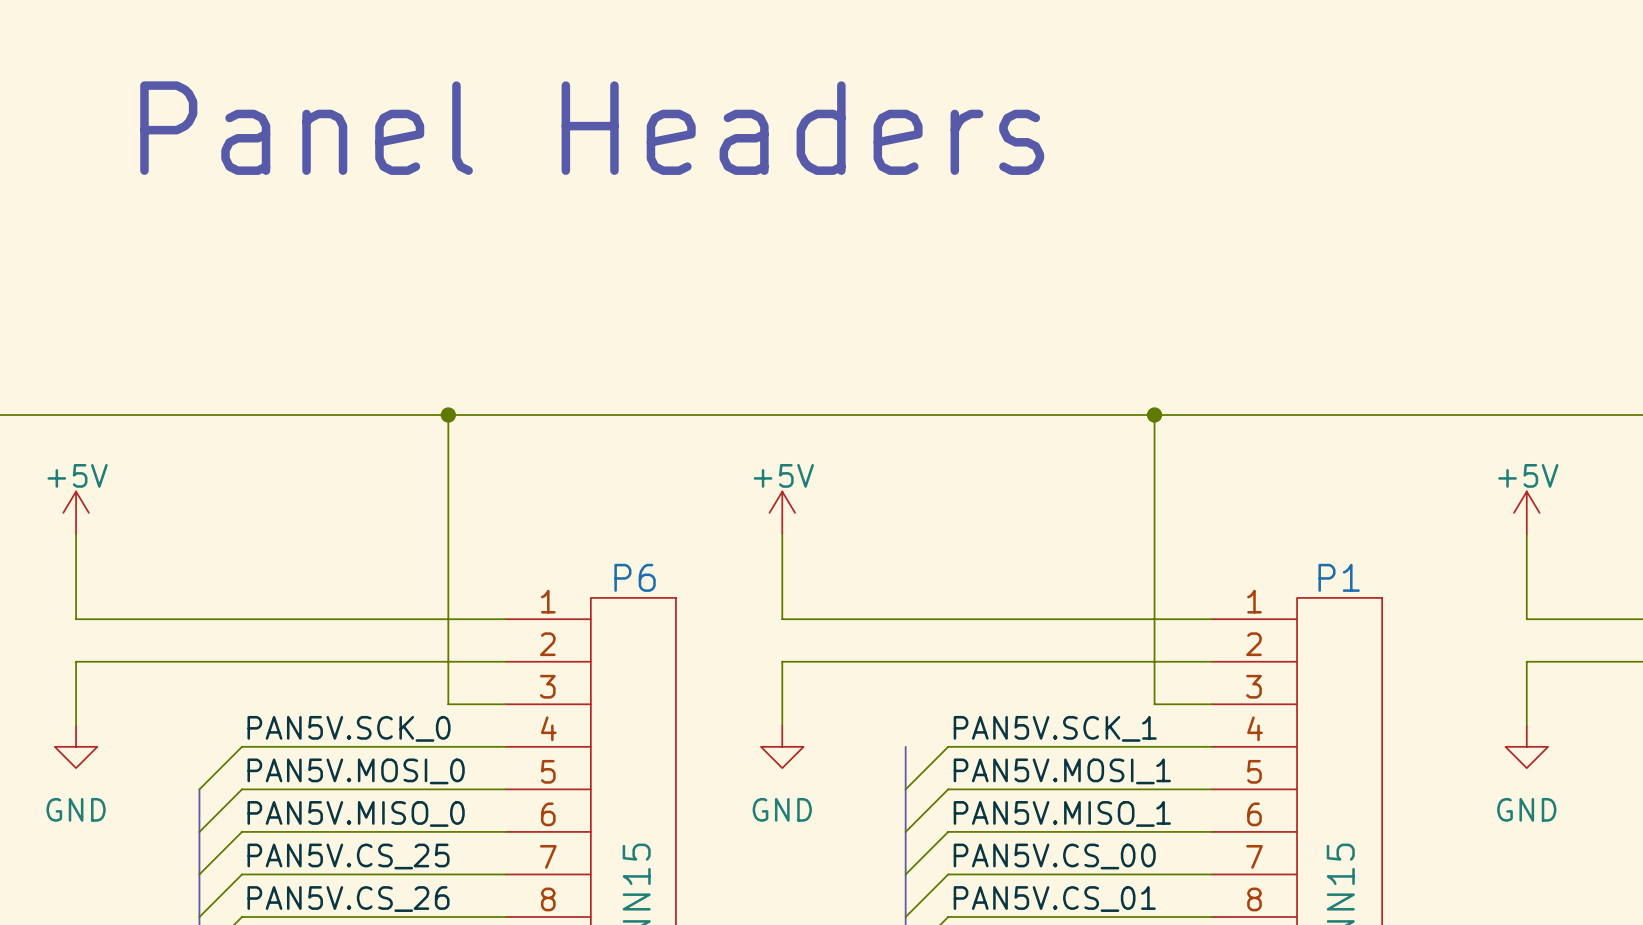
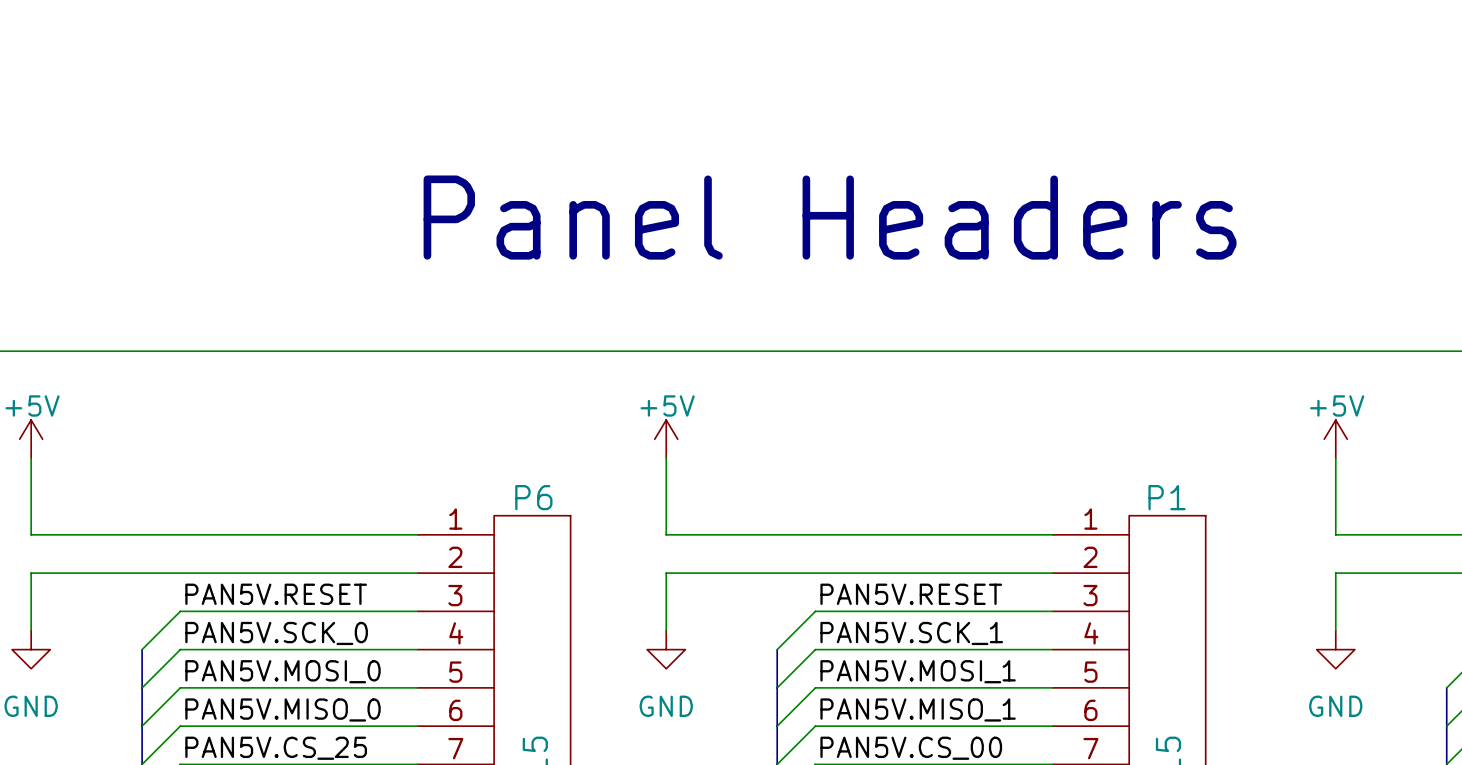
text position: Panel Headers (592, 128) -> Panel Headers (830, 217)
wire: (448, 415) (448, 704) -> (142, 649) (180, 611) (365, 611)
junction: (448, 415) -> none
wire: (1154, 415) (1154, 704) -> (777, 649) (815, 611) (1001, 611)
junction: (1154, 415) -> none
label: none -> PAN5V.RESET (276, 594)
label: none -> PAN5V.RESET (911, 594)
bus: none -> (142, 649) (142, 687)

